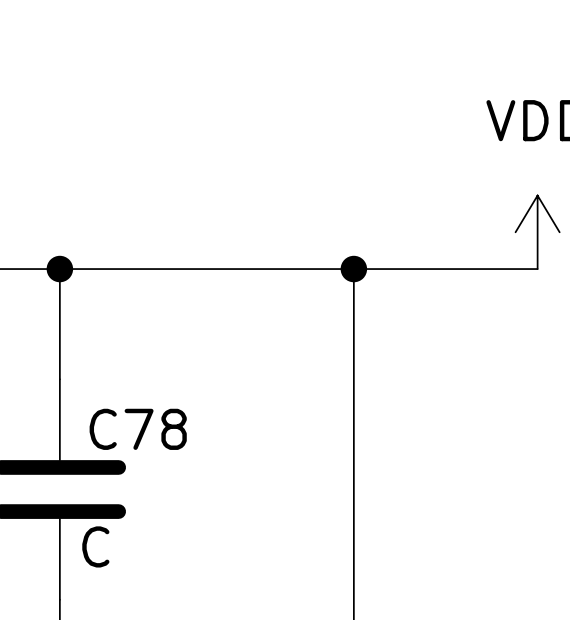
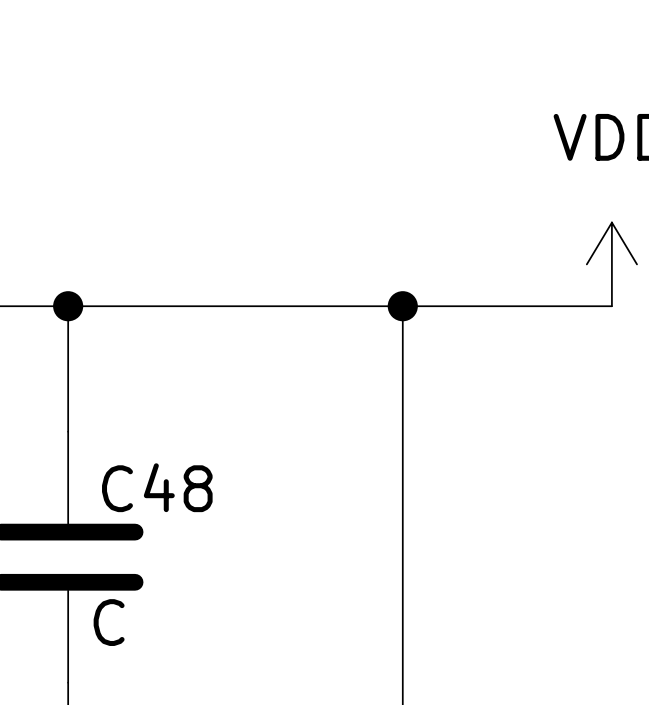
C78 name: C78 (138, 429) -> C48 (157, 487)

